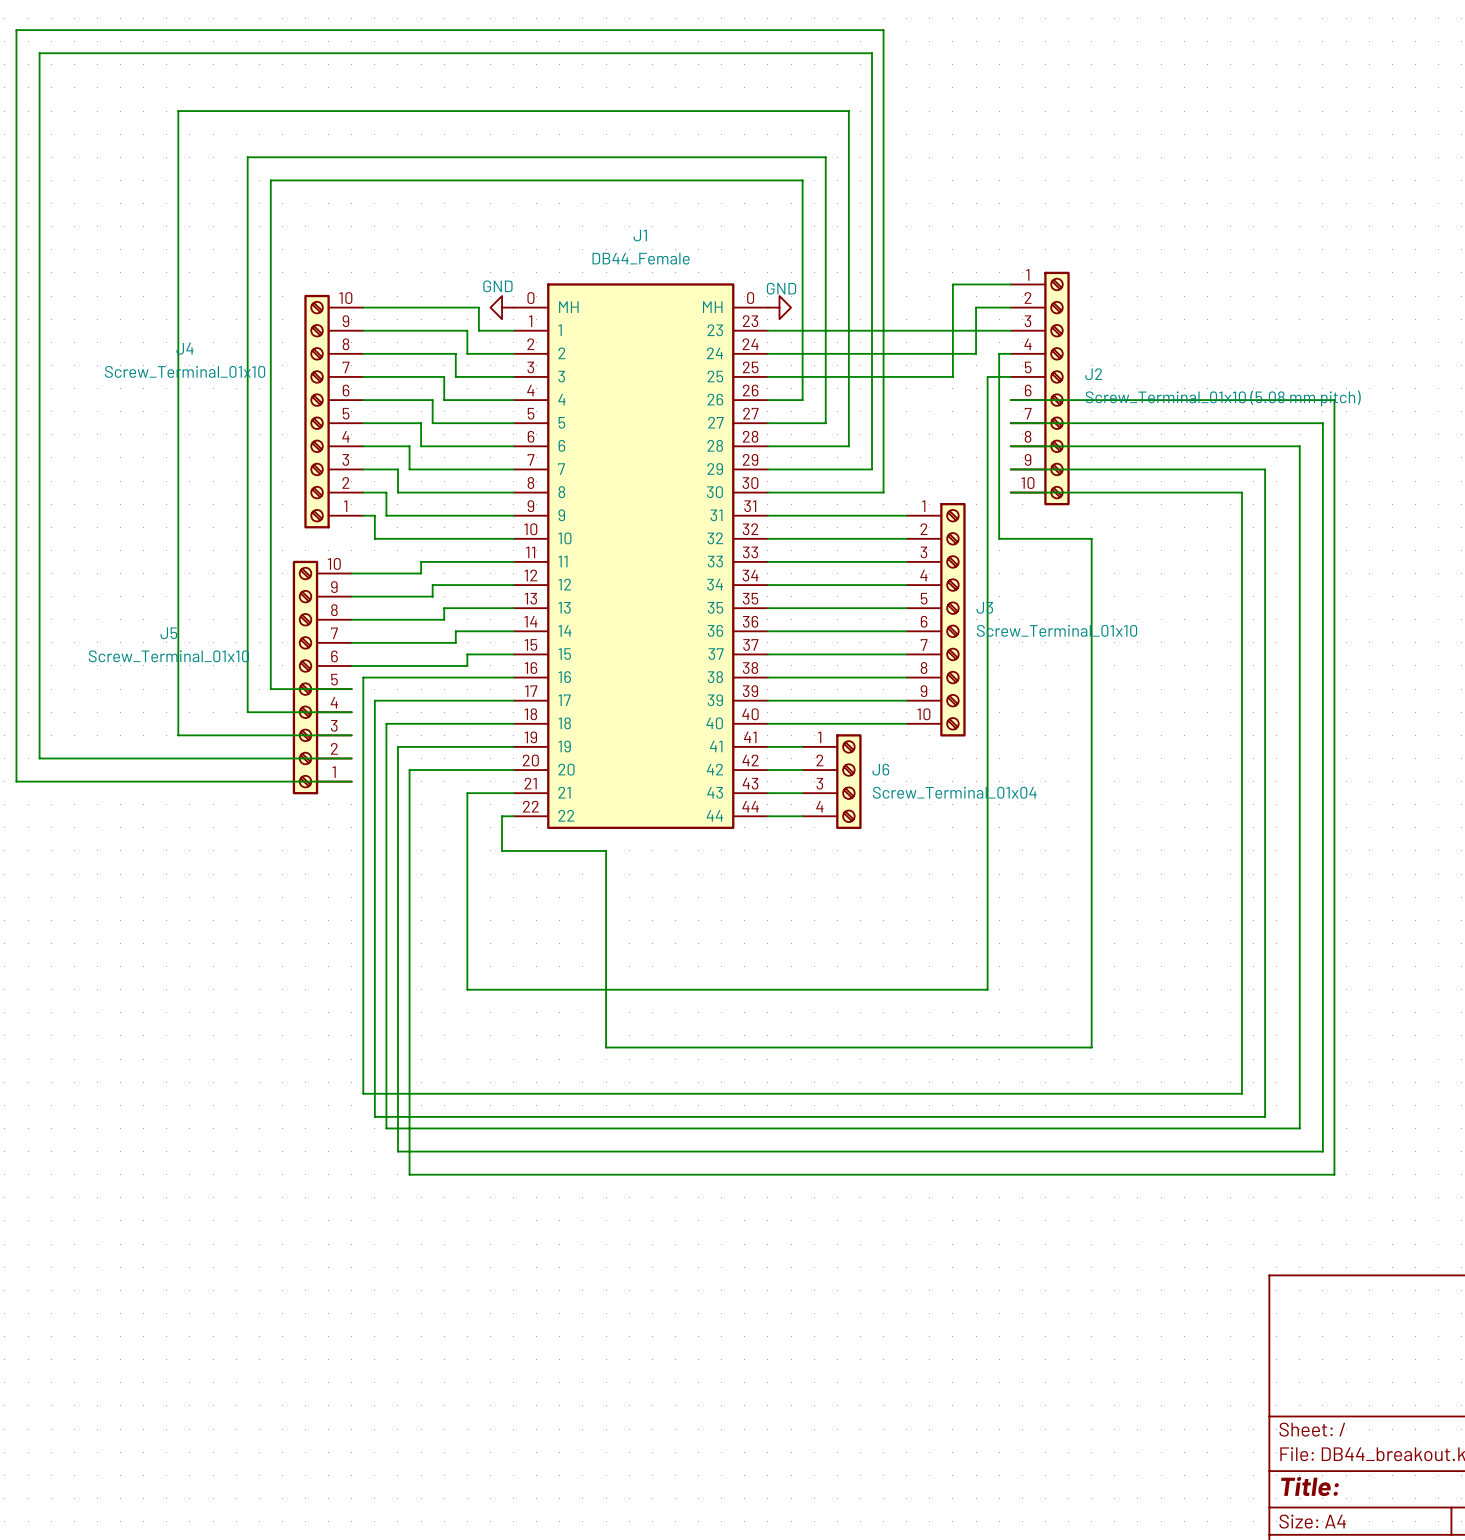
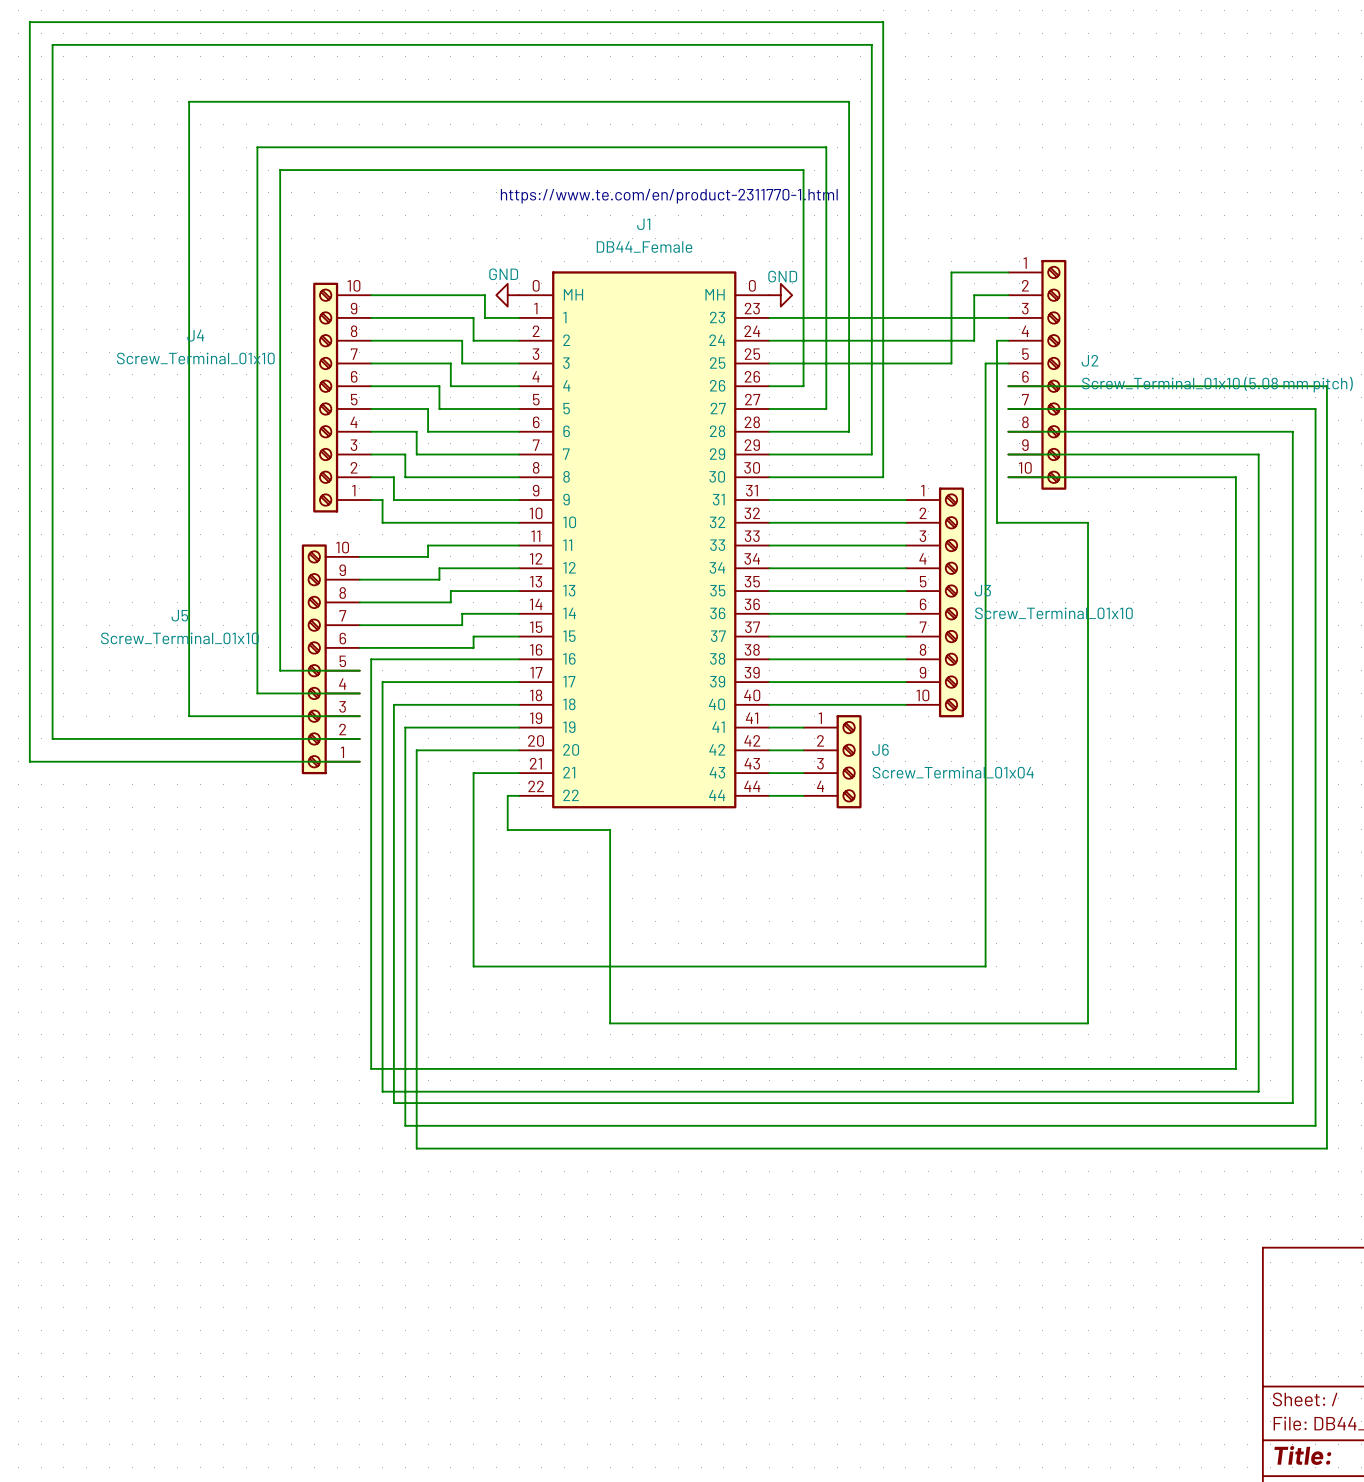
text: none -> https://www.te.com/en/product-2311770-1.html (669, 196)

